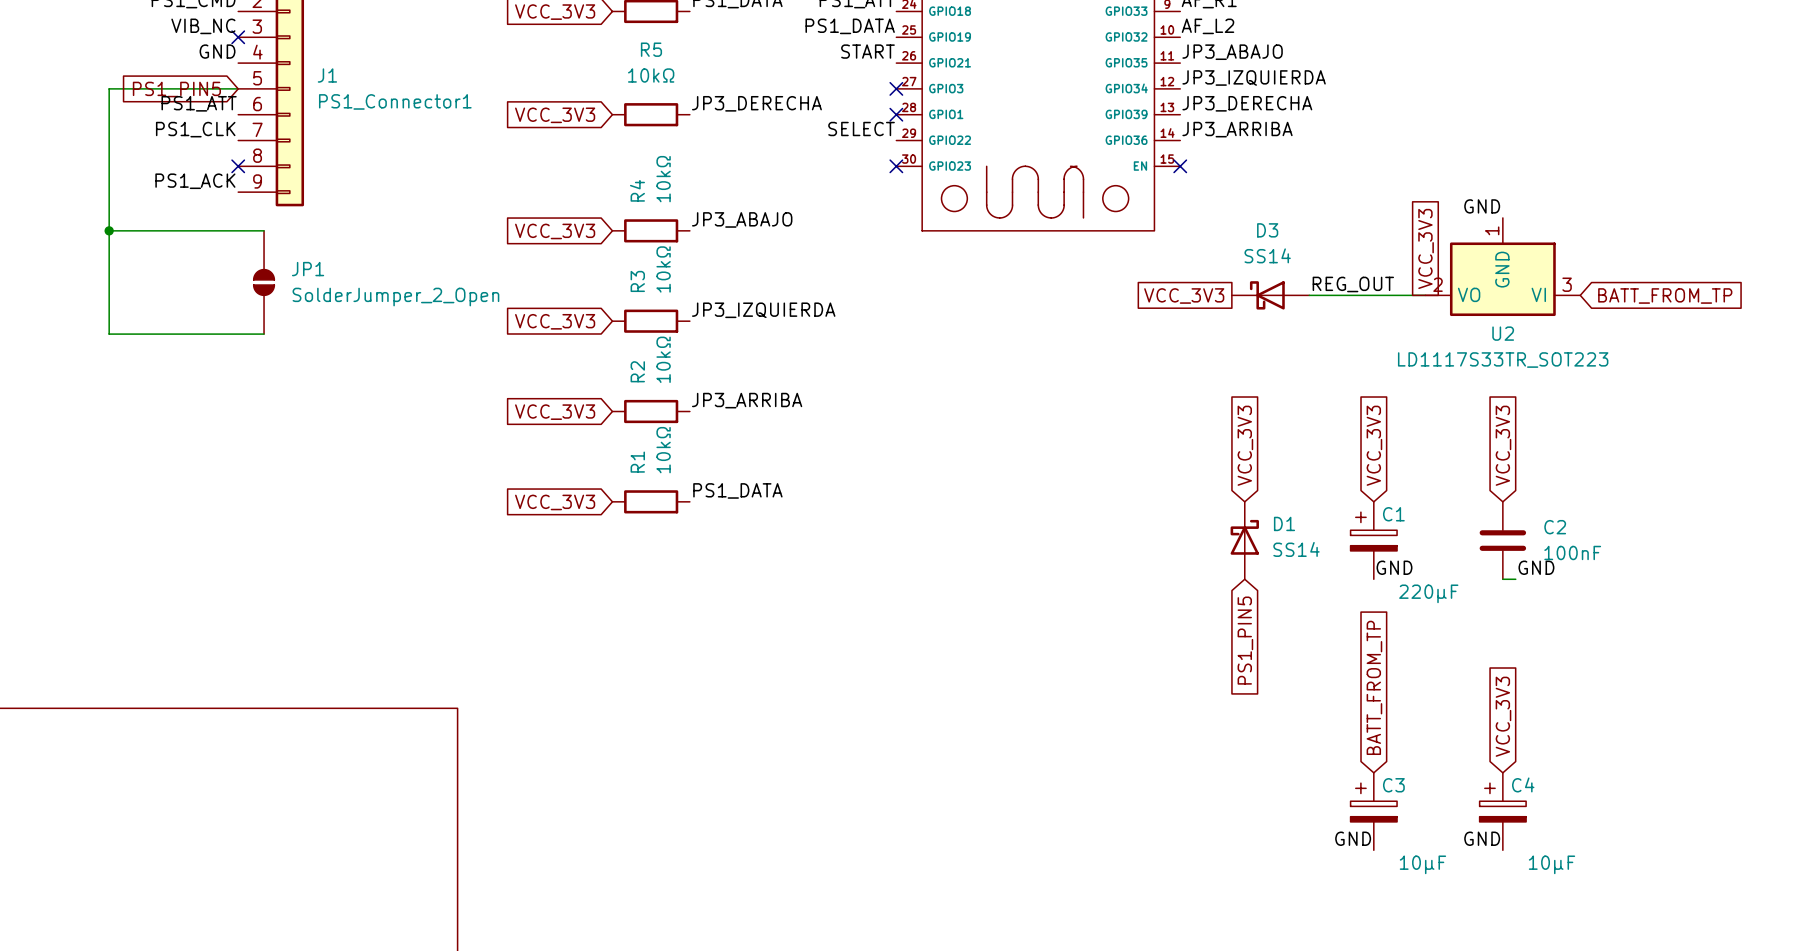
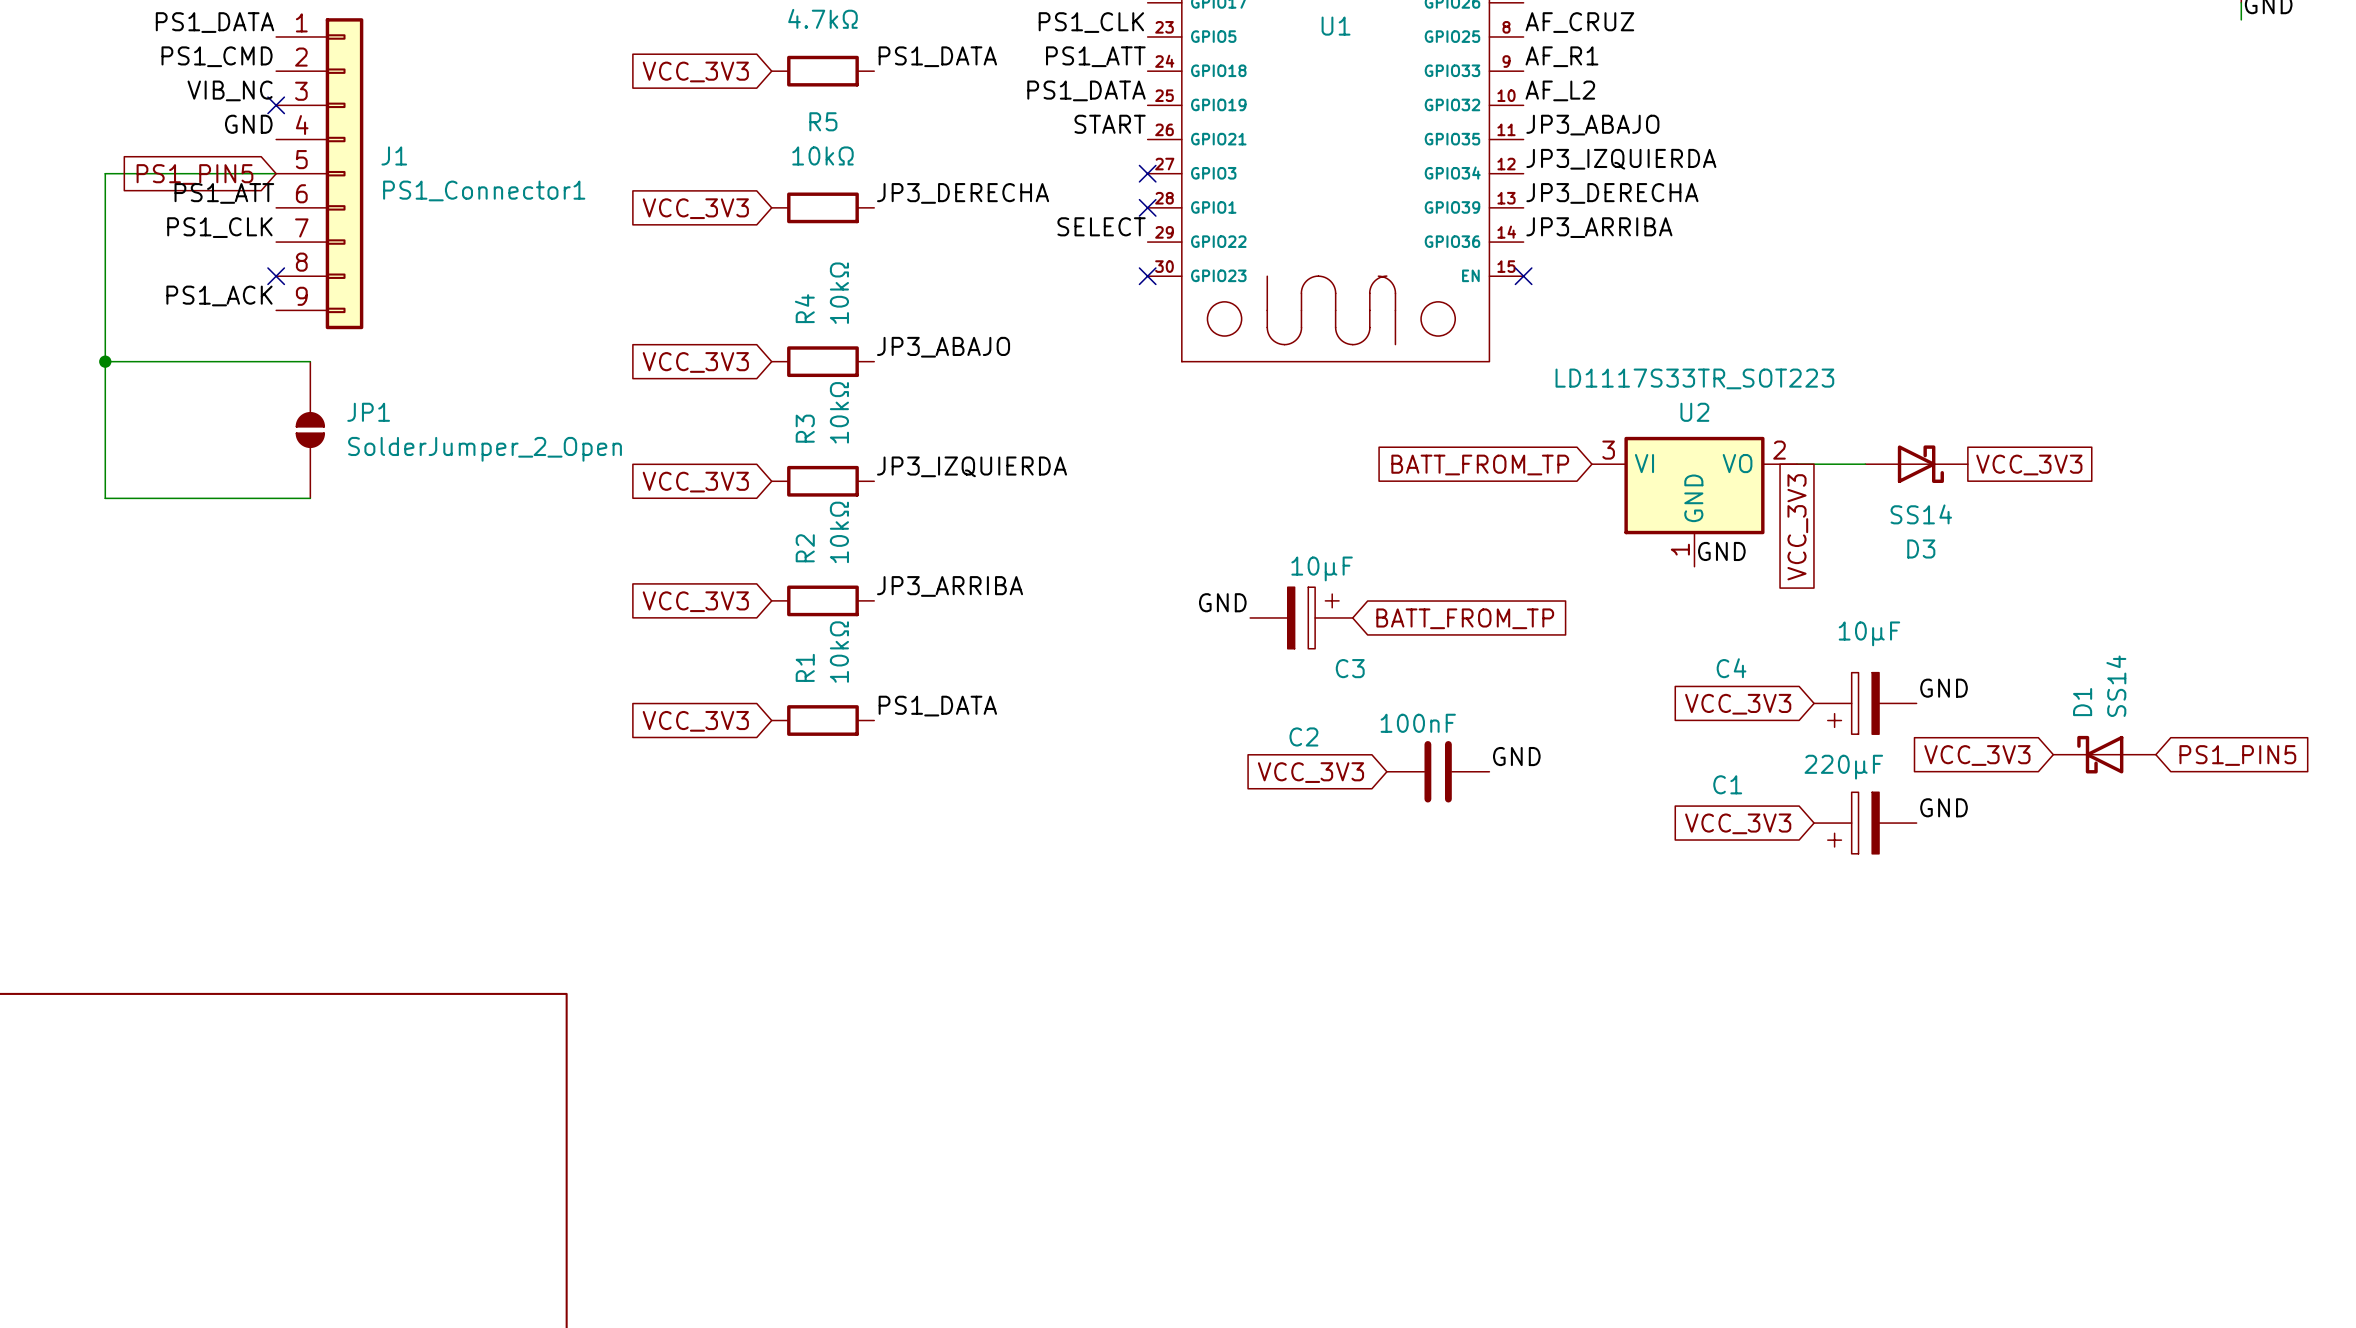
label: GND (1482, 206) -> none
global label rotation: 0° (1426, 248) -> 180° (1797, 527)
global label position: VCC_3V3 (1426, 248) -> VCC_3V3 (1797, 527)
U2 position: (1502, 266) -> (1694, 501)
U2 rotation: 0° (1502, 279) -> 180° (1694, 485)
label: REG_OUT (1353, 284) -> none
global label: VCC_3V3 (1184, 295) -> none
D3 rotation: 0° (1267, 295) -> 180° (1920, 464)
D3 position: (1270, 295) -> (1916, 464)
wire: (1309, 295) (1425, 295) -> none
global label: BATT_FROM_TP (1665, 295) -> none
global label: none -> BATT_FROM_TP (1480, 465)
wire: none -> (1797, 464) (1865, 464)
global label: none -> VCC_3V3 (2029, 465)
label: none -> GND (1721, 551)
label: none -> GND (1222, 602)
global label: none -> BATT_FROM_TP (1465, 618)
global label: VCC_3V3 (1245, 445) -> none
global label rotation: 0° (1374, 445) -> 90° counterclockwise (1738, 704)
global label: VCC_3V3 (1503, 445) -> none
label: none -> GND (1944, 688)
C1 name position: C1 (1393, 514) -> C1 (1727, 784)
C2 name position: C2 (1555, 527) -> C2 (1303, 736)
global label: none -> VCC_3V3 (1977, 755)
global label: none -> PS1_PIN5 (2237, 755)
label: none -> GND (1516, 756)
C1 rotation: 0° (1373, 531) -> 90° counterclockwise (1853, 823)
D1 rotation: 0° (1244, 537) -> 90° counterclockwise (2100, 754)
D1 position: (1244, 540) -> (2104, 754)
C1 position: (1373, 540) -> (1865, 823)
C2 rotation: 0° (1502, 540) -> 90° clockwise (1438, 771)
C2 position: (1502, 540) -> (1438, 771)
global label: none -> VCC_3V3 (1310, 772)
C2 value position: 100nF (1572, 552) -> 100nF (1418, 723)
label: GND (1394, 567) -> none
label position: GND (1536, 567) -> GND (1944, 807)
global label: none -> VCC_3V3 (1738, 823)
wire: (1502, 579) (1515, 579) -> none
C1 value position: 220µF (1428, 593) -> 220µF (1843, 767)
global label: PS1_PIN5 (1245, 640) -> none
global label: BATT_FROM_TP (1374, 687) -> none
global label: VCC_3V3 (1503, 716) -> none
C4 name position: C4 (1523, 784) -> C4 (1731, 668)
C3 name position: C3 (1393, 785) -> C3 (1350, 668)
C3 rotation: 0° (1373, 802) -> 90° clockwise (1313, 617)
C4 rotation: 0° (1502, 802) -> 90° counterclockwise (1853, 703)
C3 position: (1373, 811) -> (1301, 617)
C4 position: (1502, 811) -> (1865, 703)
label: GND (1353, 838) -> none
label: GND (1482, 838) -> none
C3 value position: 10µF (1422, 864) -> 10µF (1322, 568)
C4 value position: 10µF (1552, 864) -> 10µF (1869, 633)

